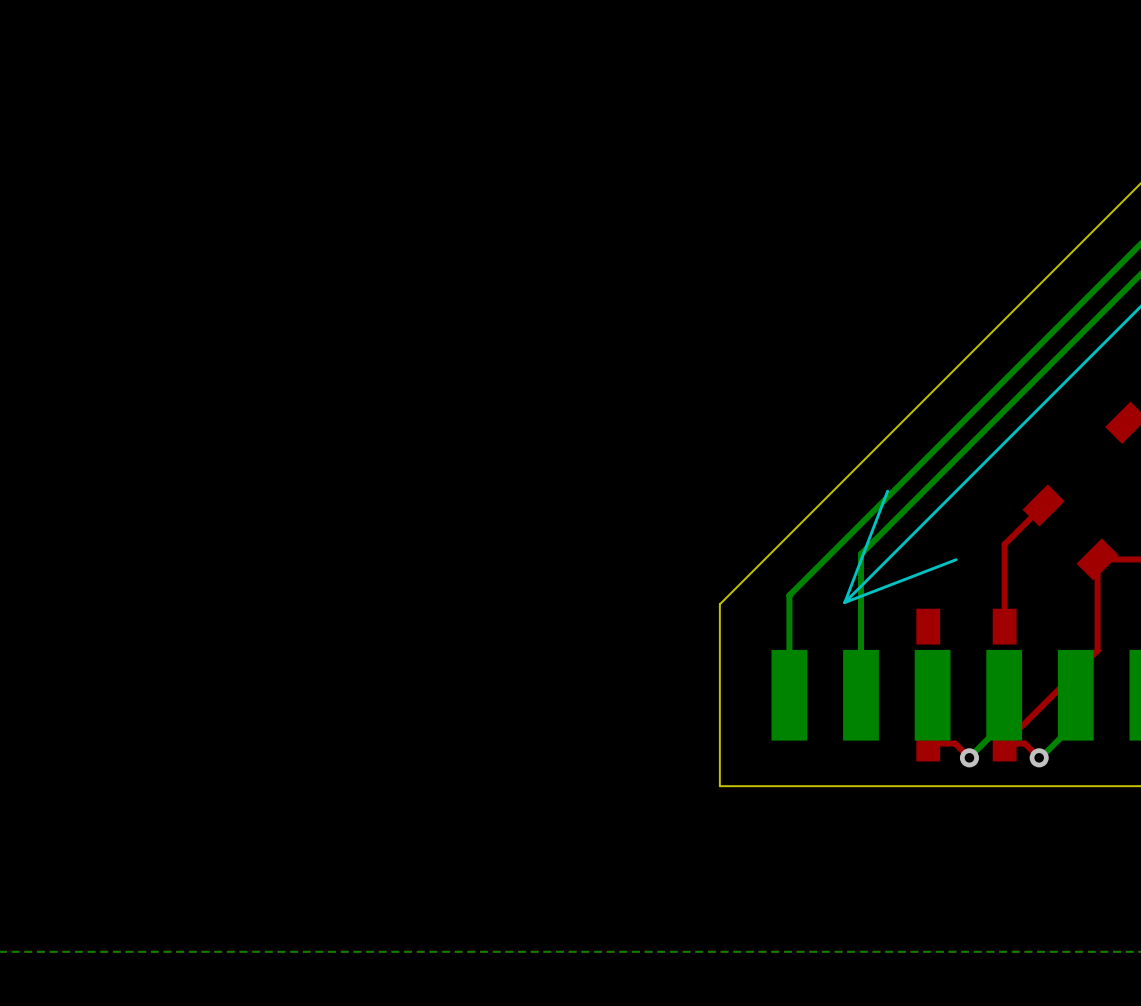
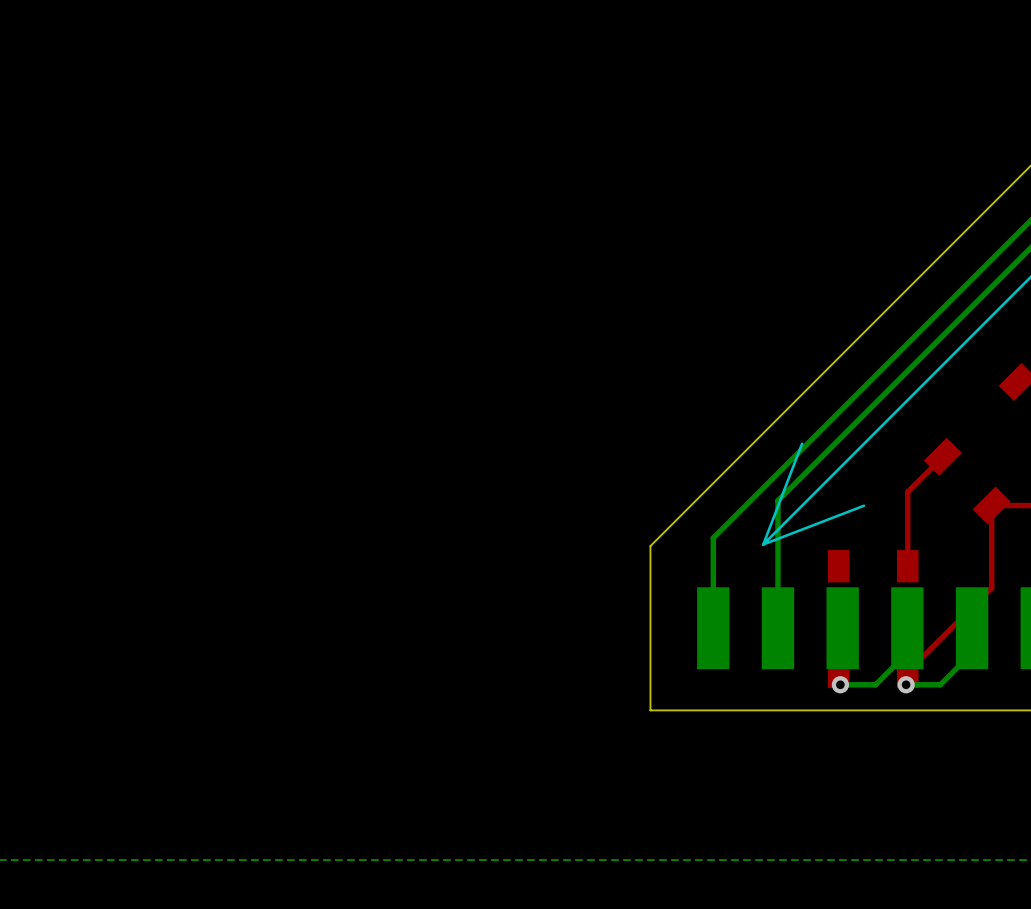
top track: (928, 743) (955, 743) (969, 757) -> none
top track: (1004, 743) (1024, 743) (1039, 757) -> none
via: none -> (840, 684)
bottom track: none -> (875, 684) (840, 684)
via: (969, 757) -> none
via: none -> (906, 684)
via: (1039, 757) -> none
bottom track: none -> (940, 684) (906, 684)

